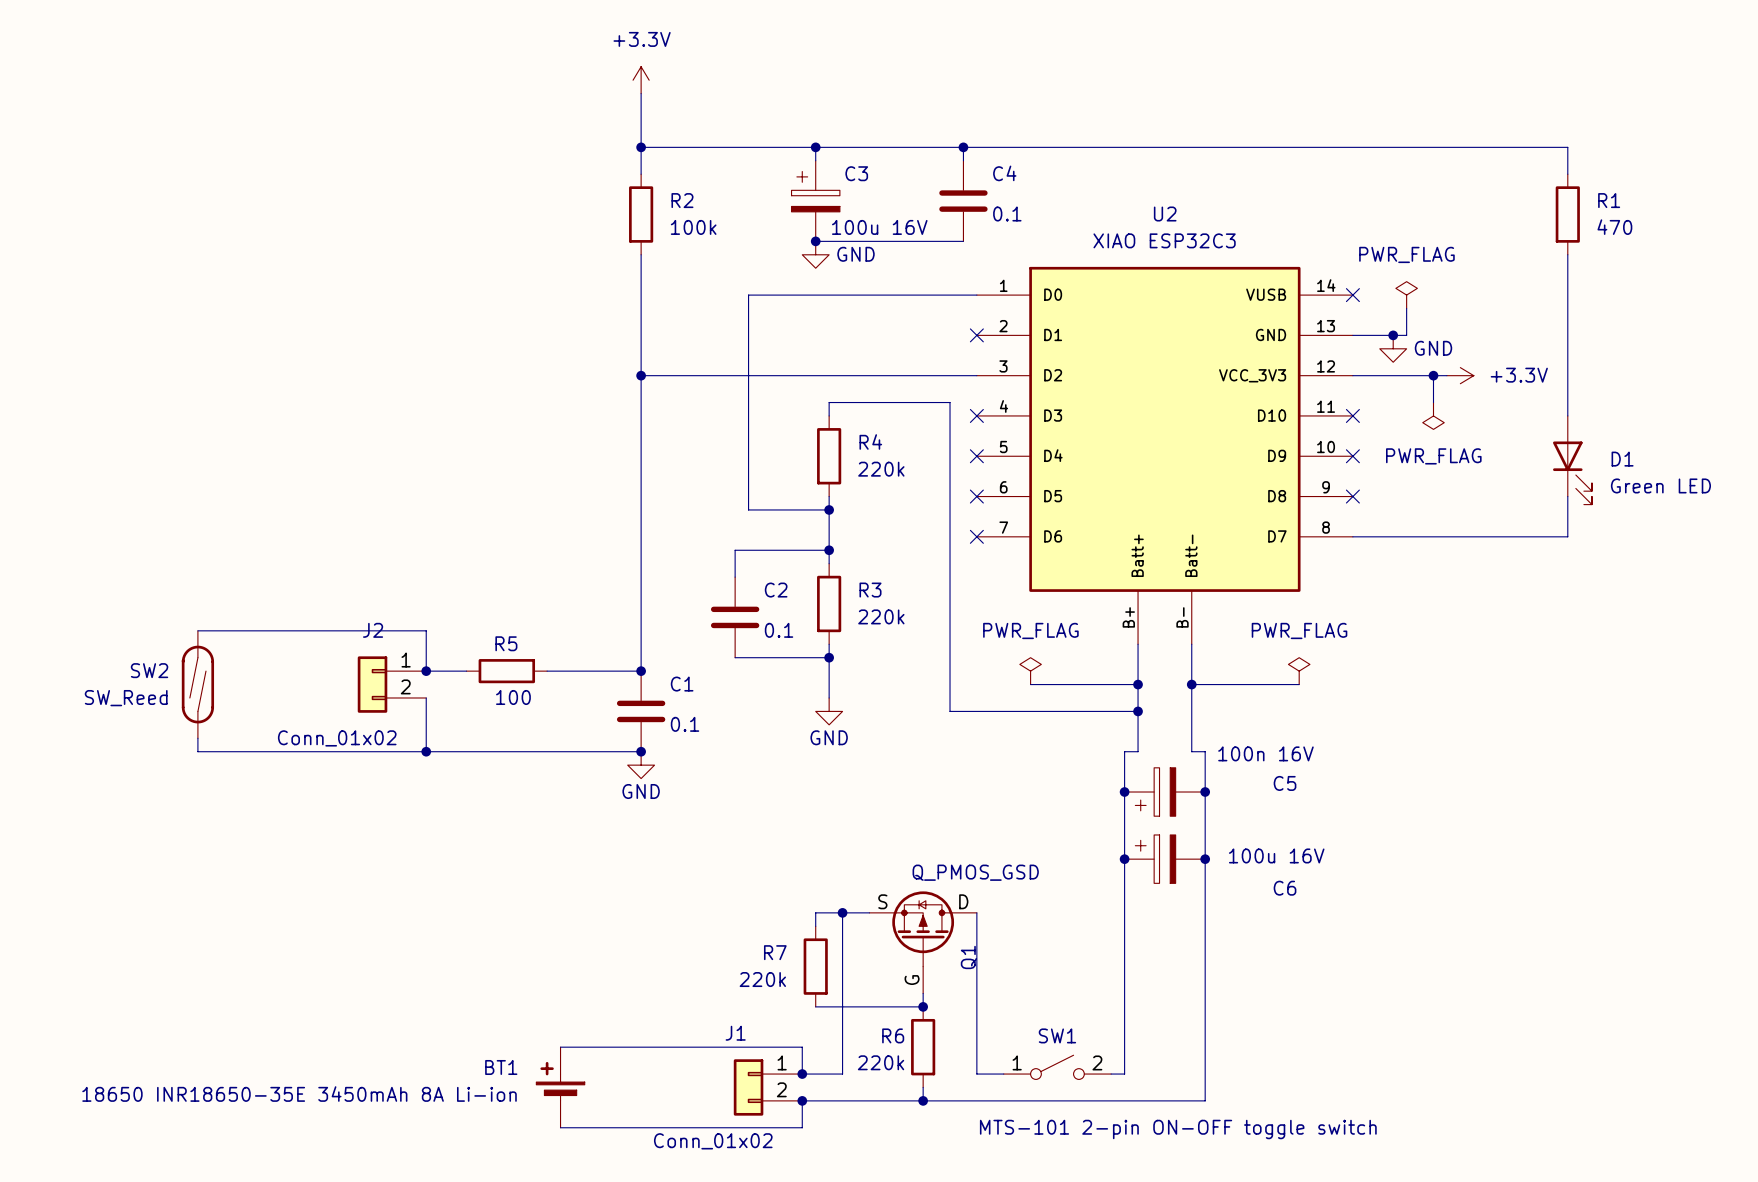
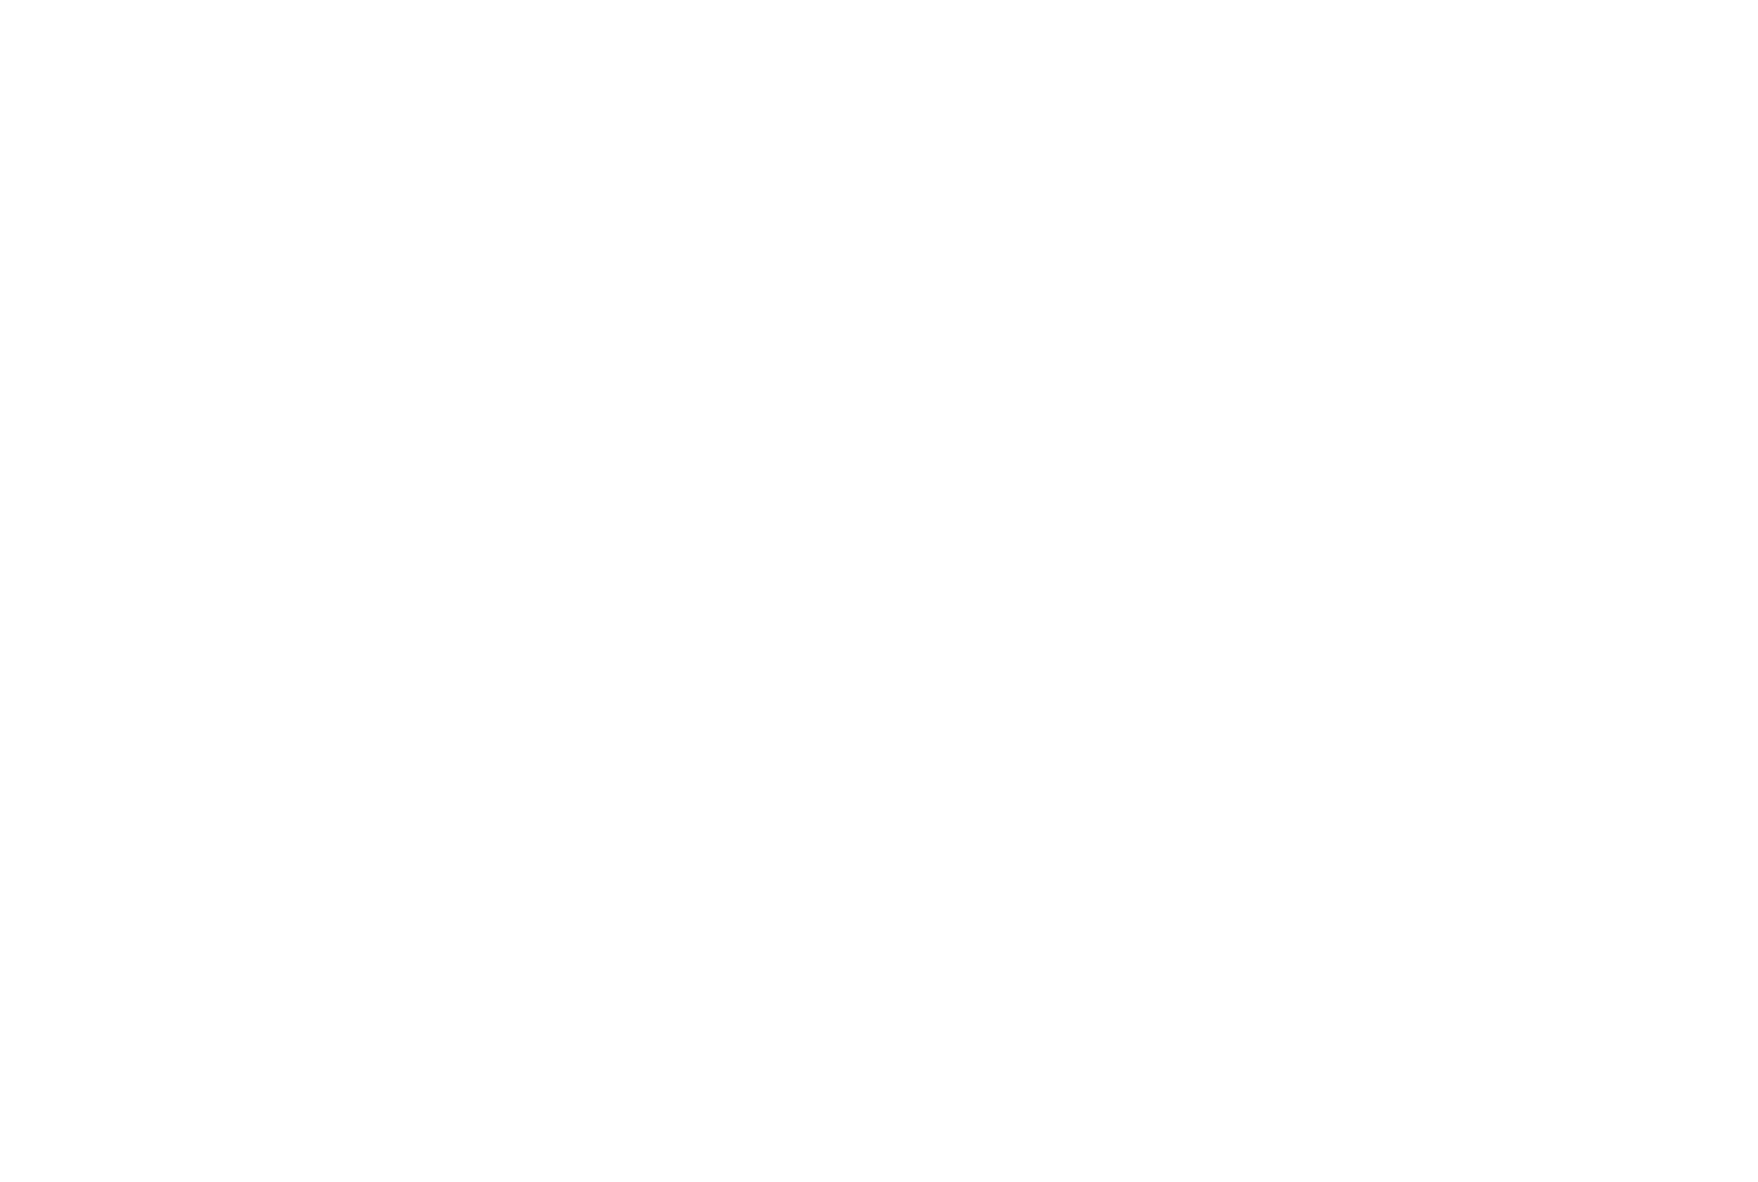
power symbol: +3.3V (641, 80) -> none
wire: (641, 93) (641, 174) -> none
wire: (641, 147) (1567, 147) (1567, 174) -> none
junction: (641, 147) -> none
wire: (815, 147) (815, 160) -> none
junction: (815, 147) -> none
wire: (963, 147) (963, 160) -> none
junction: (963, 147) -> none
C3: 100u 16V (815, 201) -> none
C4: 0.1 (963, 201) -> none
R2: 100k (641, 214) -> none
R1: 470 (1567, 214) -> none
wire: (815, 241) (963, 241) -> none
junction: (815, 241) -> none
wire: (641, 254) (641, 671) (547, 671) -> none
power symbol: GND (815, 254) -> none
wire: (1567, 254) (1567, 415) -> none
wire: (976, 295) (748, 295) (748, 509) (829, 509) -> none
no-connect mark: (1352, 295) -> none
power symbol: PWR_FLAG (1406, 295) -> none
wire: (1406, 308) (1406, 335) (1352, 335) -> none
no-connect mark: (976, 335) -> none
junction: (1393, 335) -> none
power symbol: GND (1393, 348) -> none
wire: (641, 375) (976, 375) -> none
junction: (641, 375) -> none
wire: (1352, 375) (1446, 375) -> none
wire: (1433, 375) (1433, 402) -> none
junction: (1433, 375) -> none
power symbol: +3.3V (1460, 375) -> none
wire: (829, 415) (829, 402) (950, 402) (950, 711) (1138, 711) -> none
no-connect mark: (976, 415) -> none
no-connect mark: (1352, 415) -> none
power symbol: PWR_FLAG (1433, 415) -> none
U2: XIAO ESP32C3 (1164, 455) -> none
R4: 220k (829, 456) -> none
no-connect mark: (976, 456) -> none
no-connect mark: (1352, 456) -> none
D1: Green LED (1572, 460) -> none
wire: (829, 496) (829, 563) -> none
no-connect mark: (976, 496) -> none
no-connect mark: (1352, 496) -> none
wire: (1567, 496) (1567, 536) (1352, 536) -> none
junction: (829, 509) -> none
no-connect mark: (976, 536) -> none
wire: (829, 550) (735, 550) (735, 577) -> none
junction: (829, 550) -> none
R3: 220k (829, 603) -> none
C2: 0.1 (735, 617) -> none
wire: (197, 630) (426, 630) (426, 671) (466, 671) -> none
wire: (829, 644) (829, 697) -> none
wire: (1138, 644) (1138, 751) (1124, 751) (1124, 1074) (1111, 1074) -> none
wire: (1191, 644) (1191, 751) (1205, 751) (1205, 1100) (802, 1100) (802, 1127) (560, 1127) -> none
wire: (735, 657) (829, 657) -> none
junction: (829, 657) -> none
junction: (426, 671) -> none
R5: 100 (506, 671) -> none
junction: (641, 671) -> none
power symbol: PWR_FLAG (1030, 671) -> none
power symbol: PWR_FLAG (1299, 671) -> none
SW2: SW_Reed (197, 684) -> none
J2: Conn_01x02 (391, 684) -> none
wire: (1030, 684) (1138, 684) -> none
junction: (1138, 684) -> none
wire: (1191, 684) (1299, 684) -> none
junction: (1191, 684) -> none
wire: (426, 697) (426, 751) -> none
C1: 0.1 (641, 711) -> none
power symbol: GND (829, 711) -> none
junction: (1138, 711) -> none
wire: (197, 738) (197, 751) (641, 751) -> none
junction: (426, 751) -> none
junction: (641, 751) -> none
power symbol: GND (641, 765) -> none
junction: (1124, 792) -> none
C5: 100n 16V (1164, 792) -> none
junction: (1205, 792) -> none
junction: (1124, 859) -> none
C6: 100u 16V (1164, 859) -> none
junction: (1205, 859) -> none
wire: (842, 912) (842, 1074) (802, 1074) (802, 1047) (560, 1047) -> none
junction: (842, 912) -> none
wire: (869, 912) (815, 912) (815, 926) -> none
wire: (976, 912) (976, 1074) (1003, 1074) -> none
Q1: Q_PMOS_GSD (923, 942) -> none
R7: 220k (815, 966) -> none
wire: (923, 993) (923, 1006) (815, 1006) -> none
junction: (923, 1006) -> none
R6: 220k (923, 1047) -> none
SW1: MTS-101 2-pin ON-OFF toggle switch (1057, 1067) -> none
junction: (802, 1074) -> none
BT1: 18650 INR18650-35E 3450mAh 8A Li-ion (560, 1087) -> none
J1: Conn_01x02 (768, 1087) -> none
wire: (923, 1087) (923, 1100) -> none
junction: (802, 1100) -> none
junction: (923, 1100) -> none

